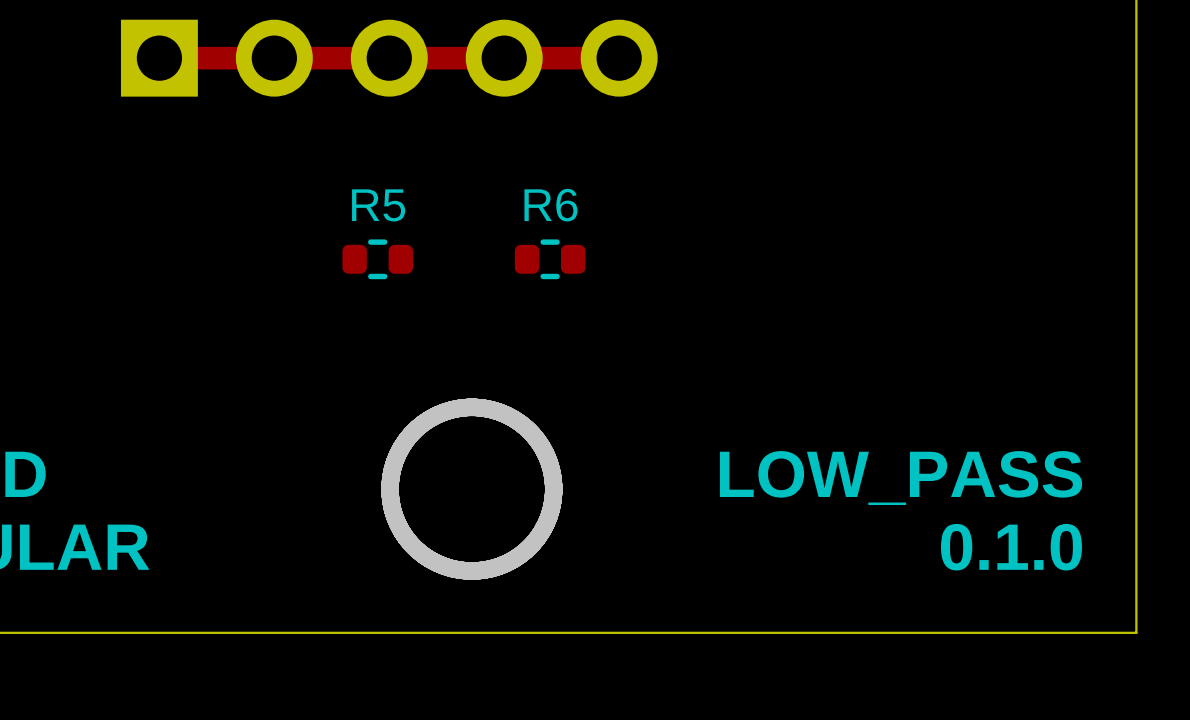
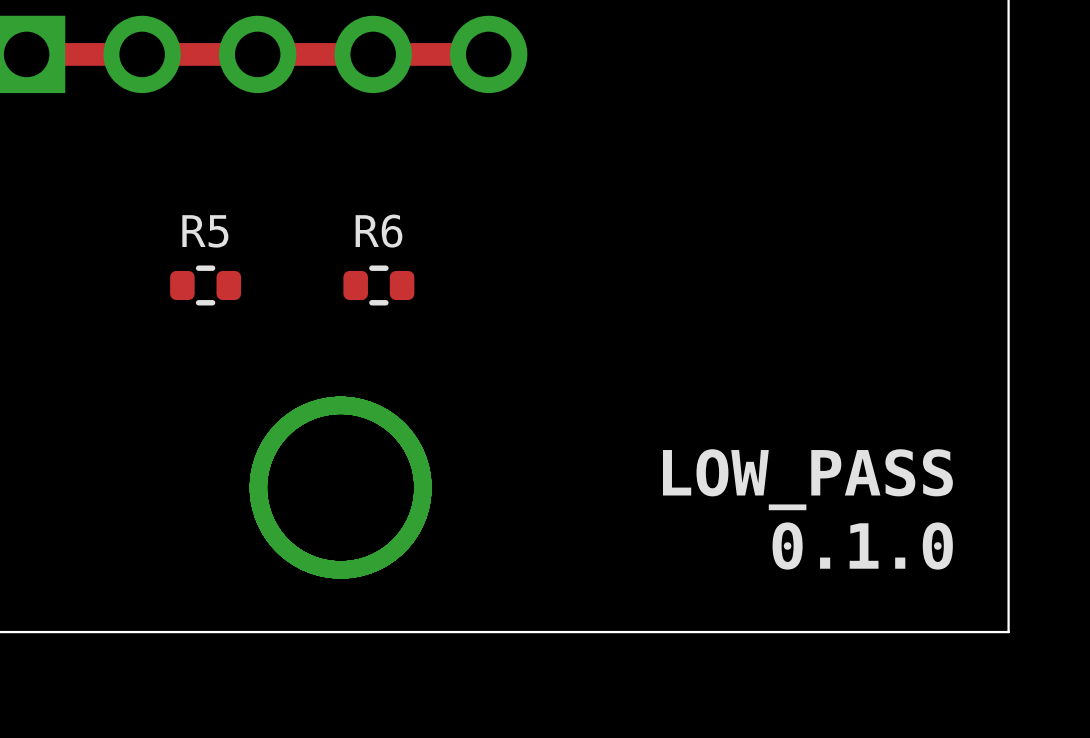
R5 position: (377, 259) -> (205, 285)
R6 position: (550, 259) -> (378, 285)

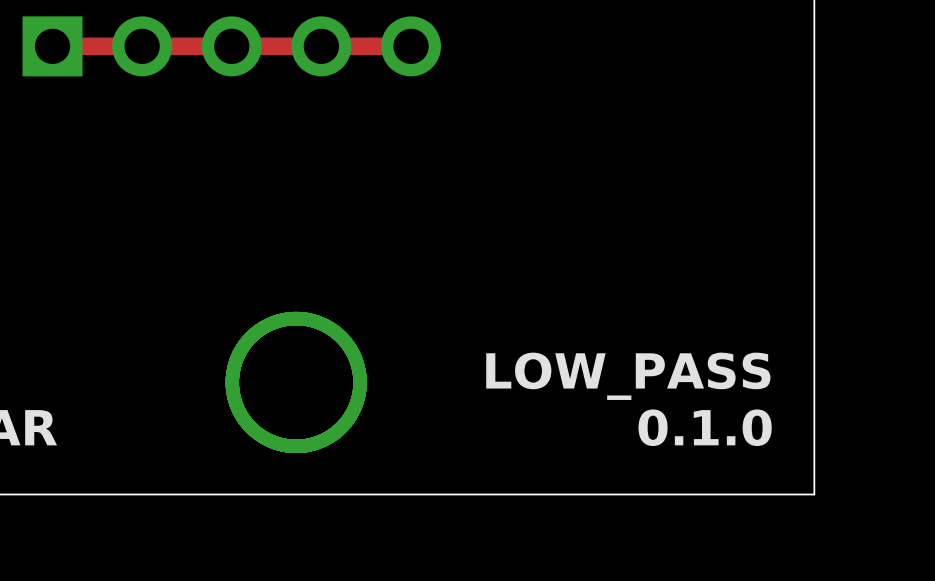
R5: (205, 285) -> none
R6: (378, 285) -> none

